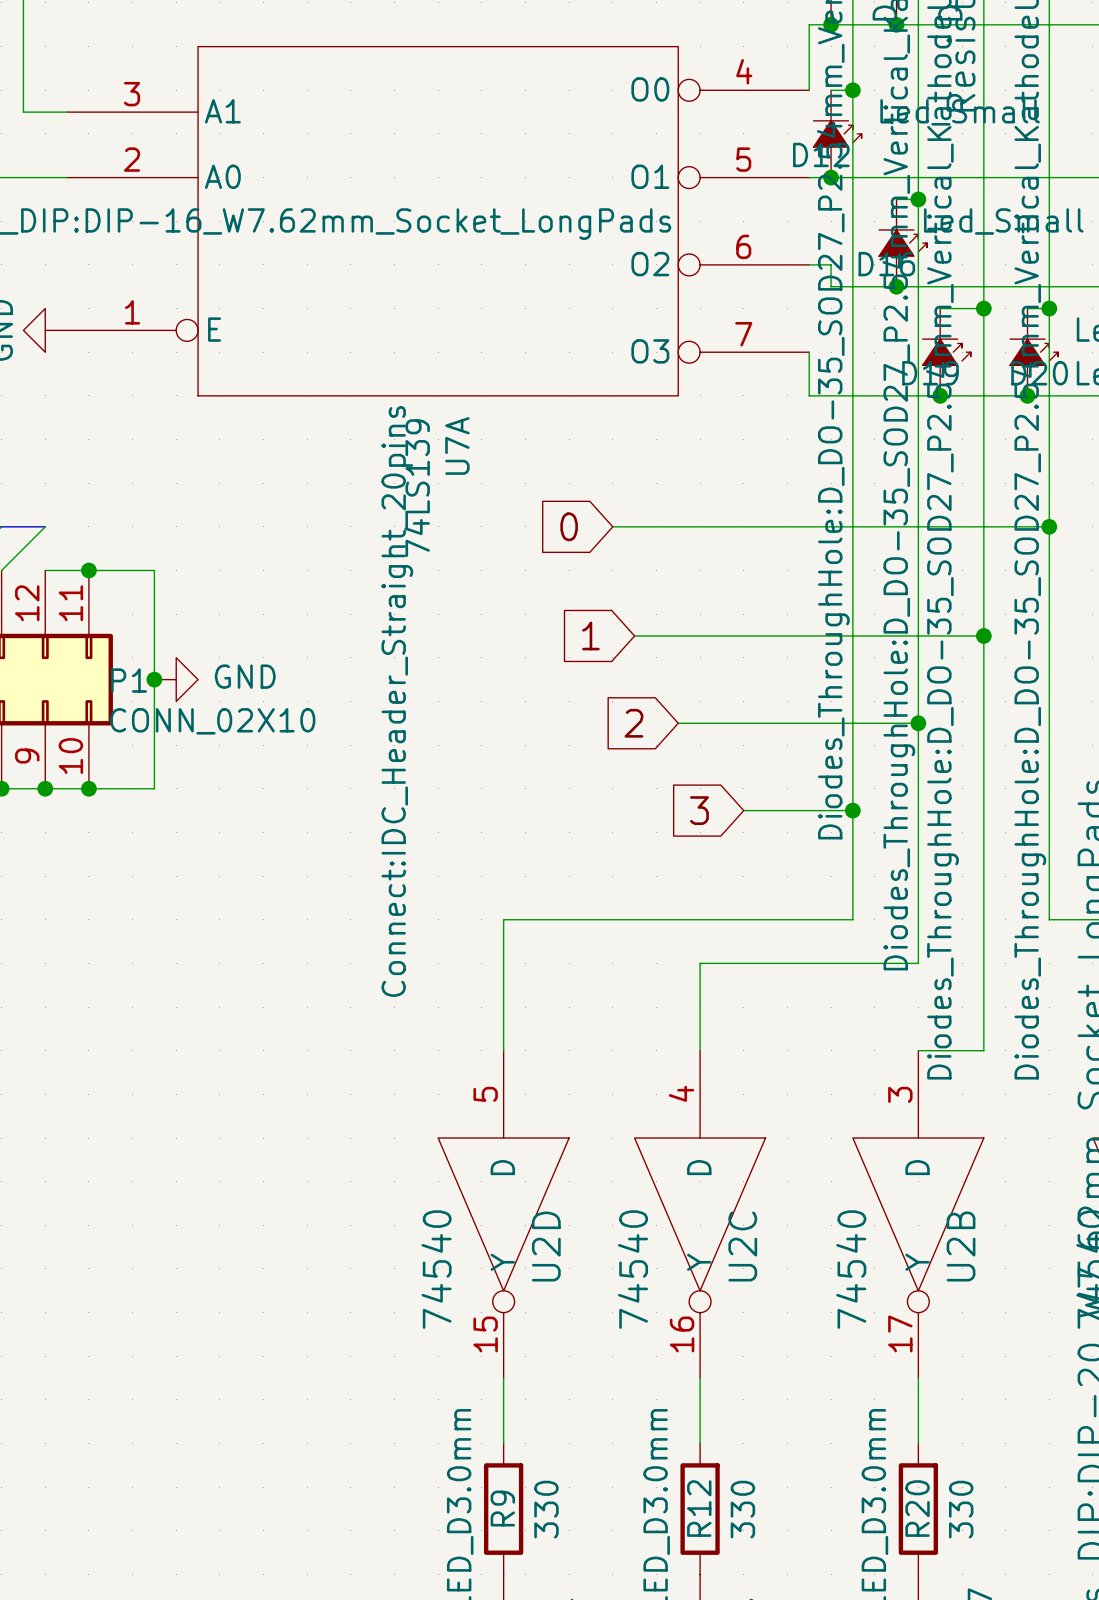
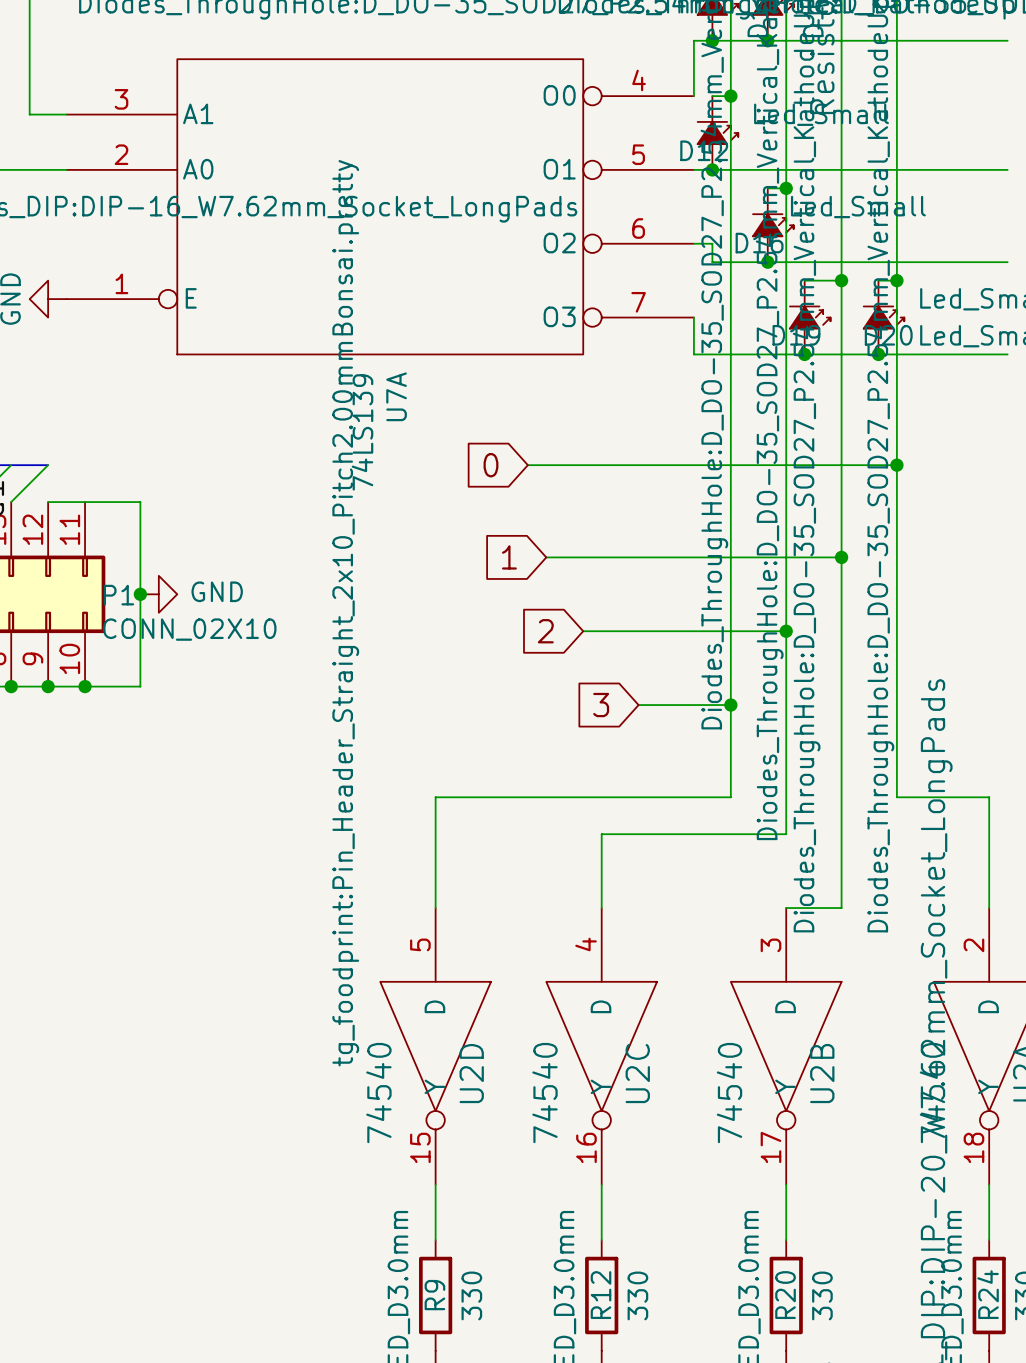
junction: (88, 570) -> none
P1 text: Connect:IDC_Header_Straight_20pins (397, 701) -> tg_foodprint:Pin_Header_Straight_2x10_Pitch2.00mmBonsai.pretty (345, 613)

